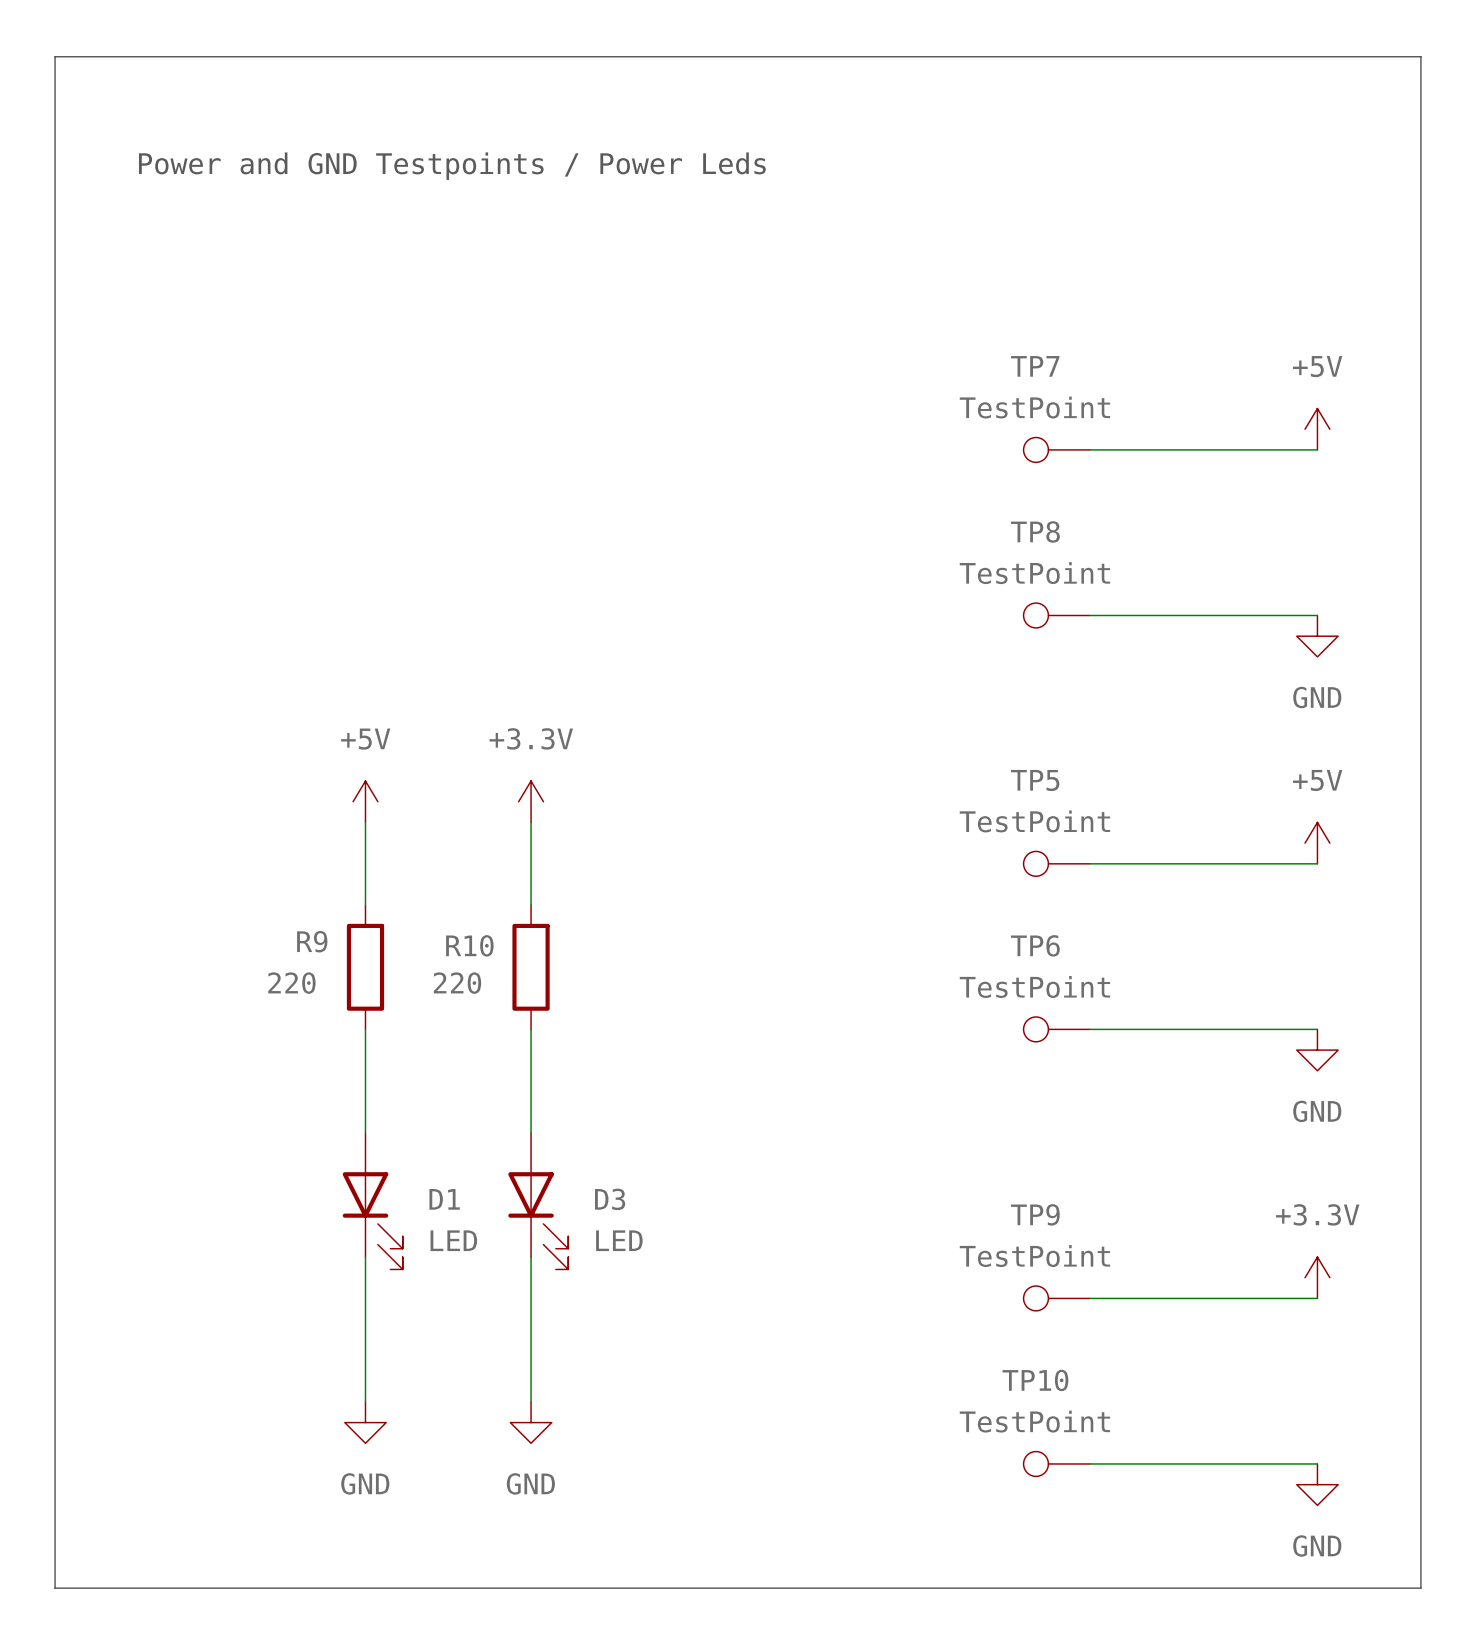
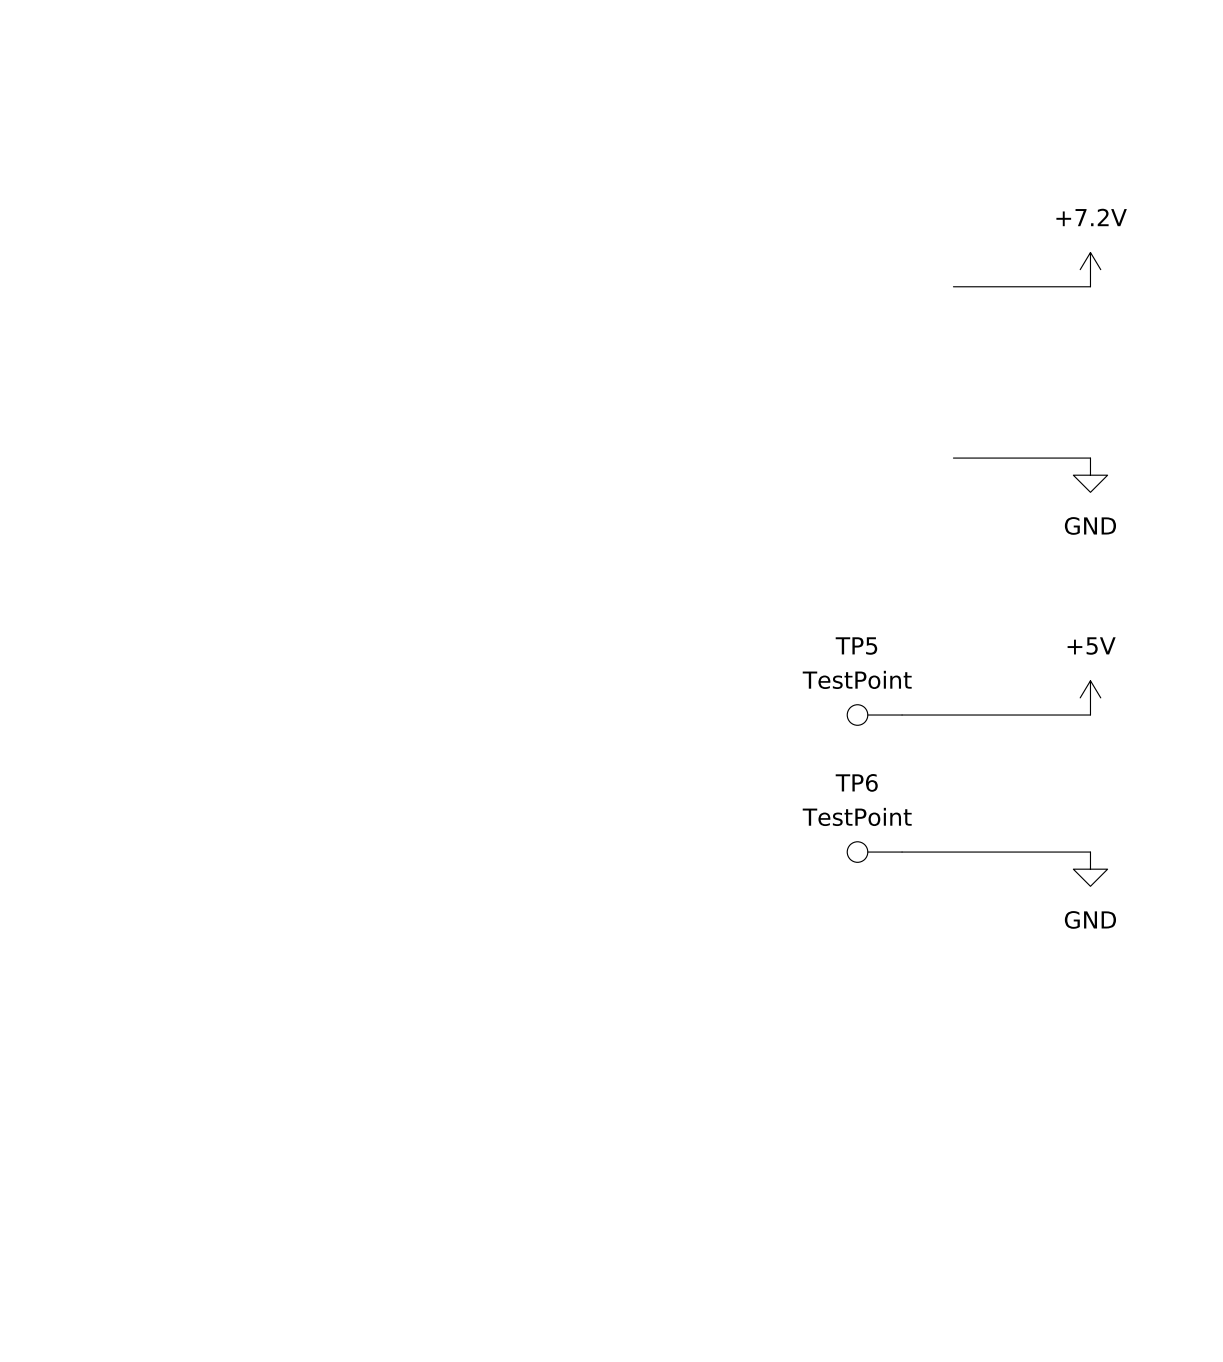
line: (55, 56) (1420, 56) (1420, 1588) (55, 1588) (55, 56) -> none
text: Power and GND Testpoints / Power Leds (452, 166) -> none
power symbol: none -> +7.2V (1090, 269)
wire: none -> (953, 286) (1090, 286)
power symbol: +5V (1317, 429) -> none
TP7: TestPoint (1056, 449) -> none
wire: (1089, 449) (1317, 449) -> none
wire: none -> (953, 458) (1090, 458)
TP8: TestPoint (1056, 615) -> none
wire: (1089, 615) (1317, 615) -> none
power symbol position: GND (1317, 636) -> GND (1090, 475)
power symbol: +5V (365, 801) -> none
power symbol: +3.3V (531, 801) -> none
wire: (365, 822) (365, 905) -> none
wire: (531, 822) (531, 905) -> none
R9: 220 (365, 967) -> none
R10: 220 (531, 967) -> none
wire: (365, 1029) (365, 1132) -> none
wire: (531, 1029) (531, 1132) -> none
D1: LED (372, 1201) -> none
D3: LED (538, 1201) -> none
wire: (365, 1257) (365, 1401) -> none
wire: (531, 1257) (531, 1401) -> none
power symbol: +3.3V (1317, 1277) -> none
TP9: TestPoint (1056, 1298) -> none
wire: (1089, 1298) (1317, 1298) -> none
power symbol: GND (365, 1422) -> none
power symbol: GND (531, 1422) -> none
TP10: TestPoint (1056, 1463) -> none
wire: (1089, 1463) (1317, 1463) -> none
power symbol: GND (1317, 1484) -> none

